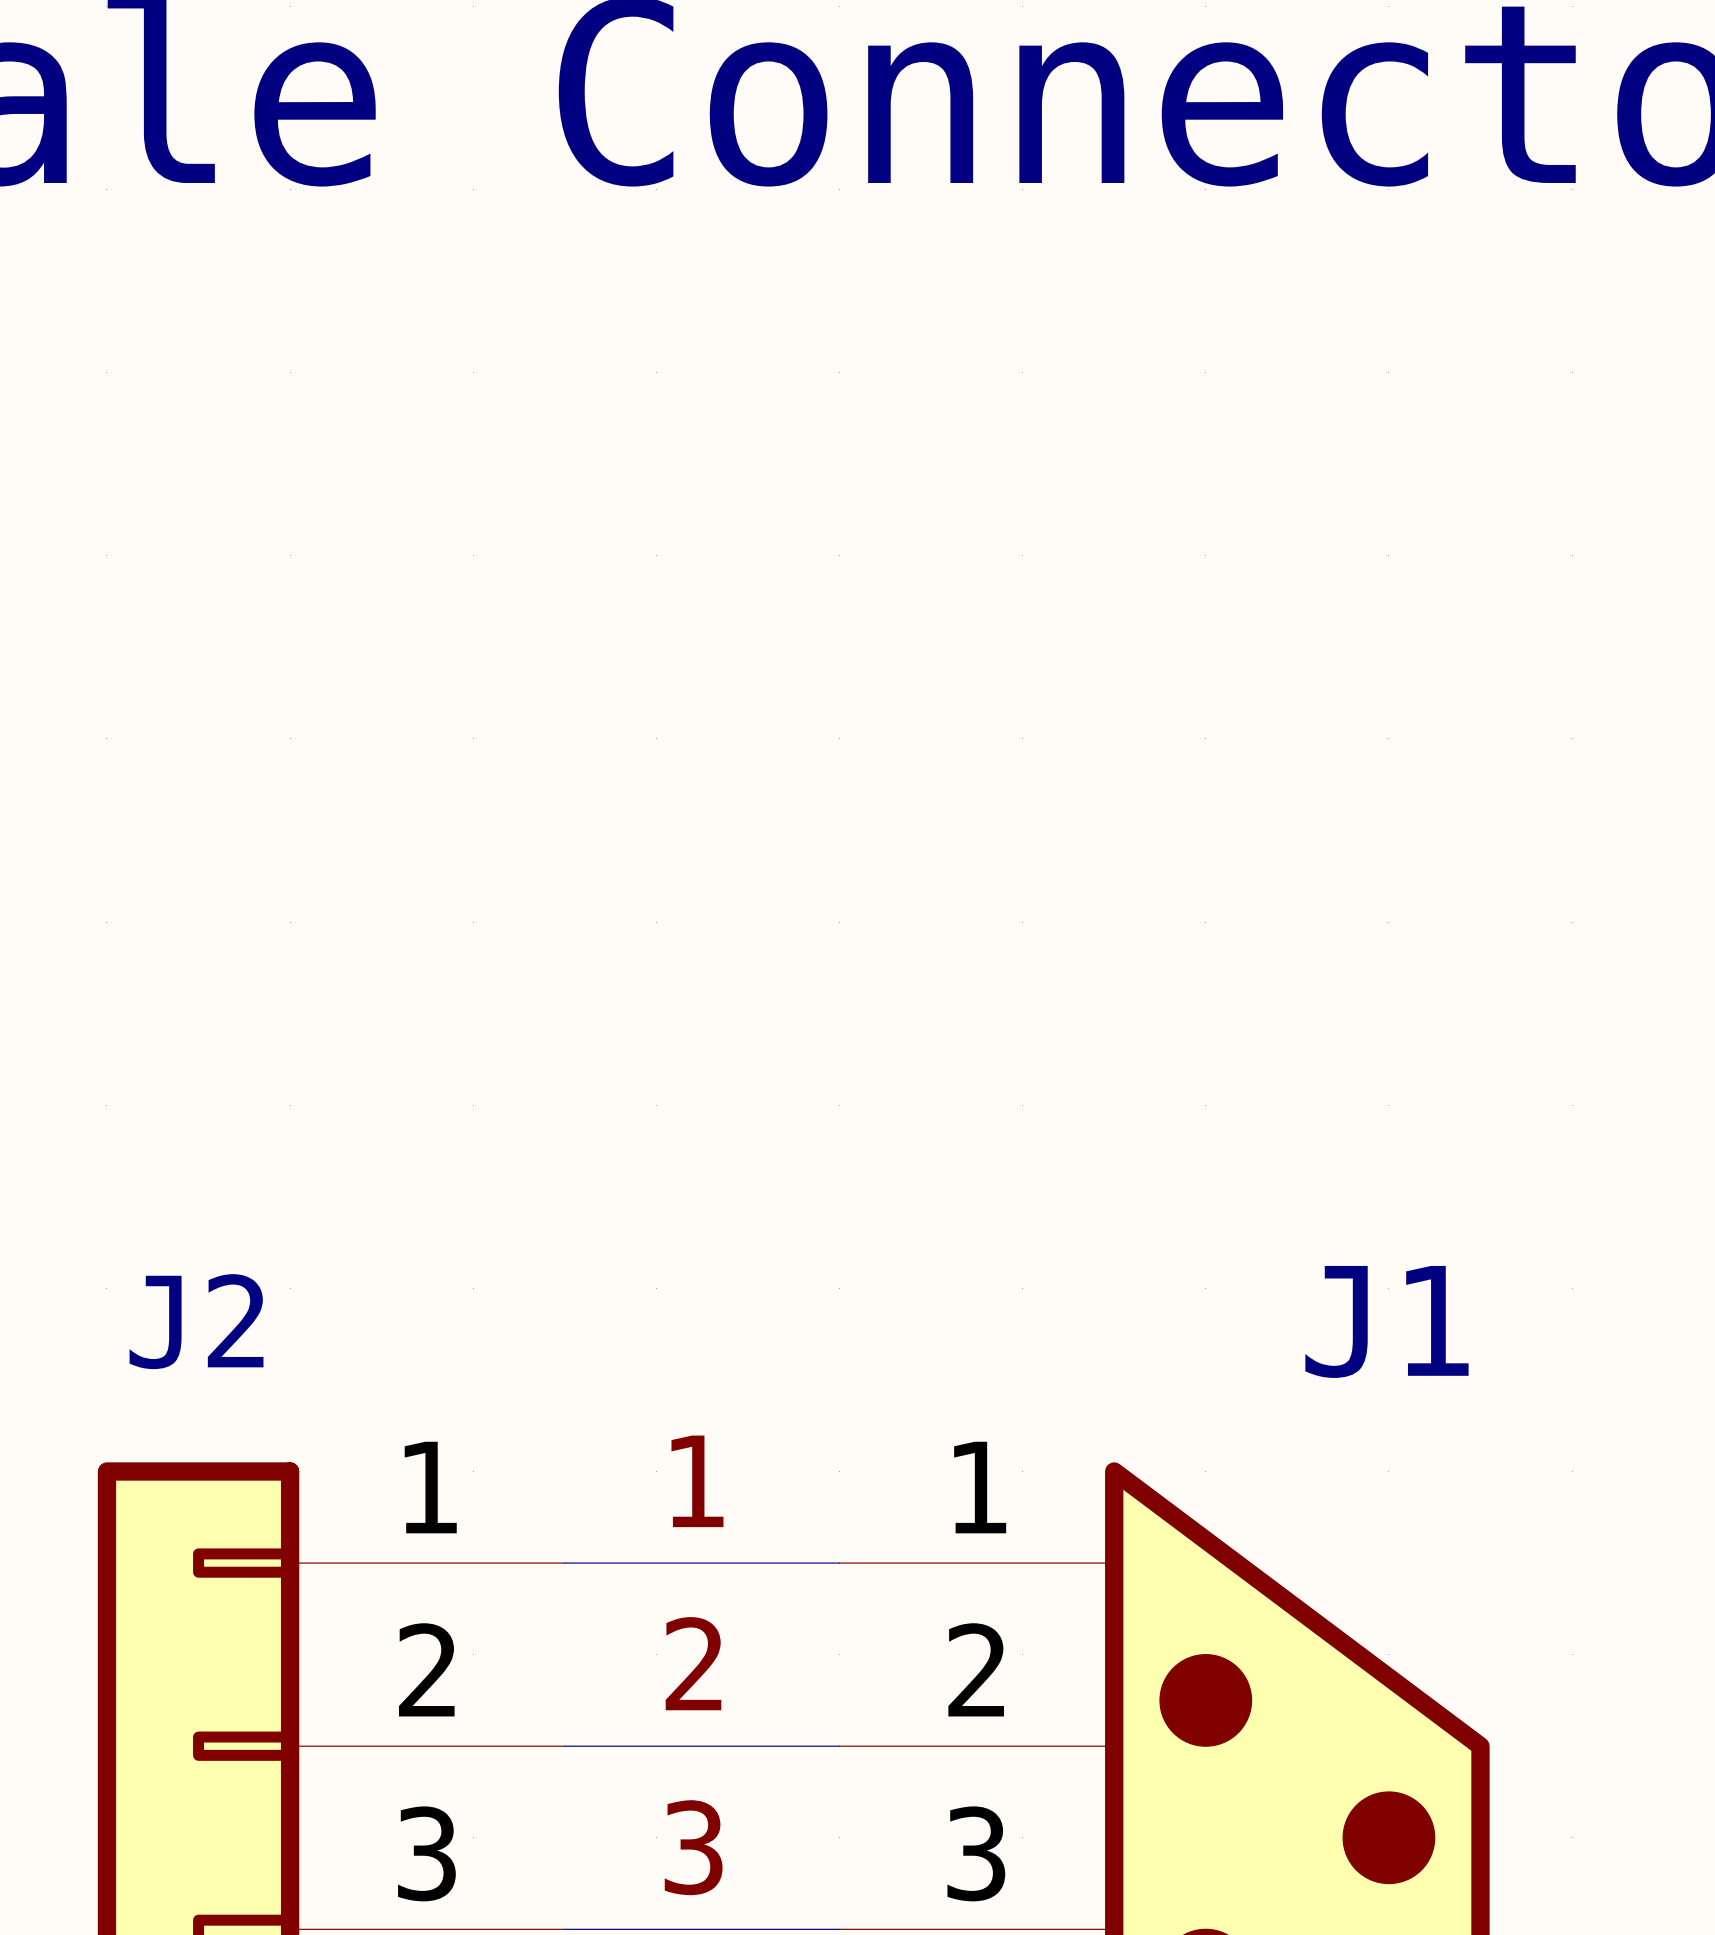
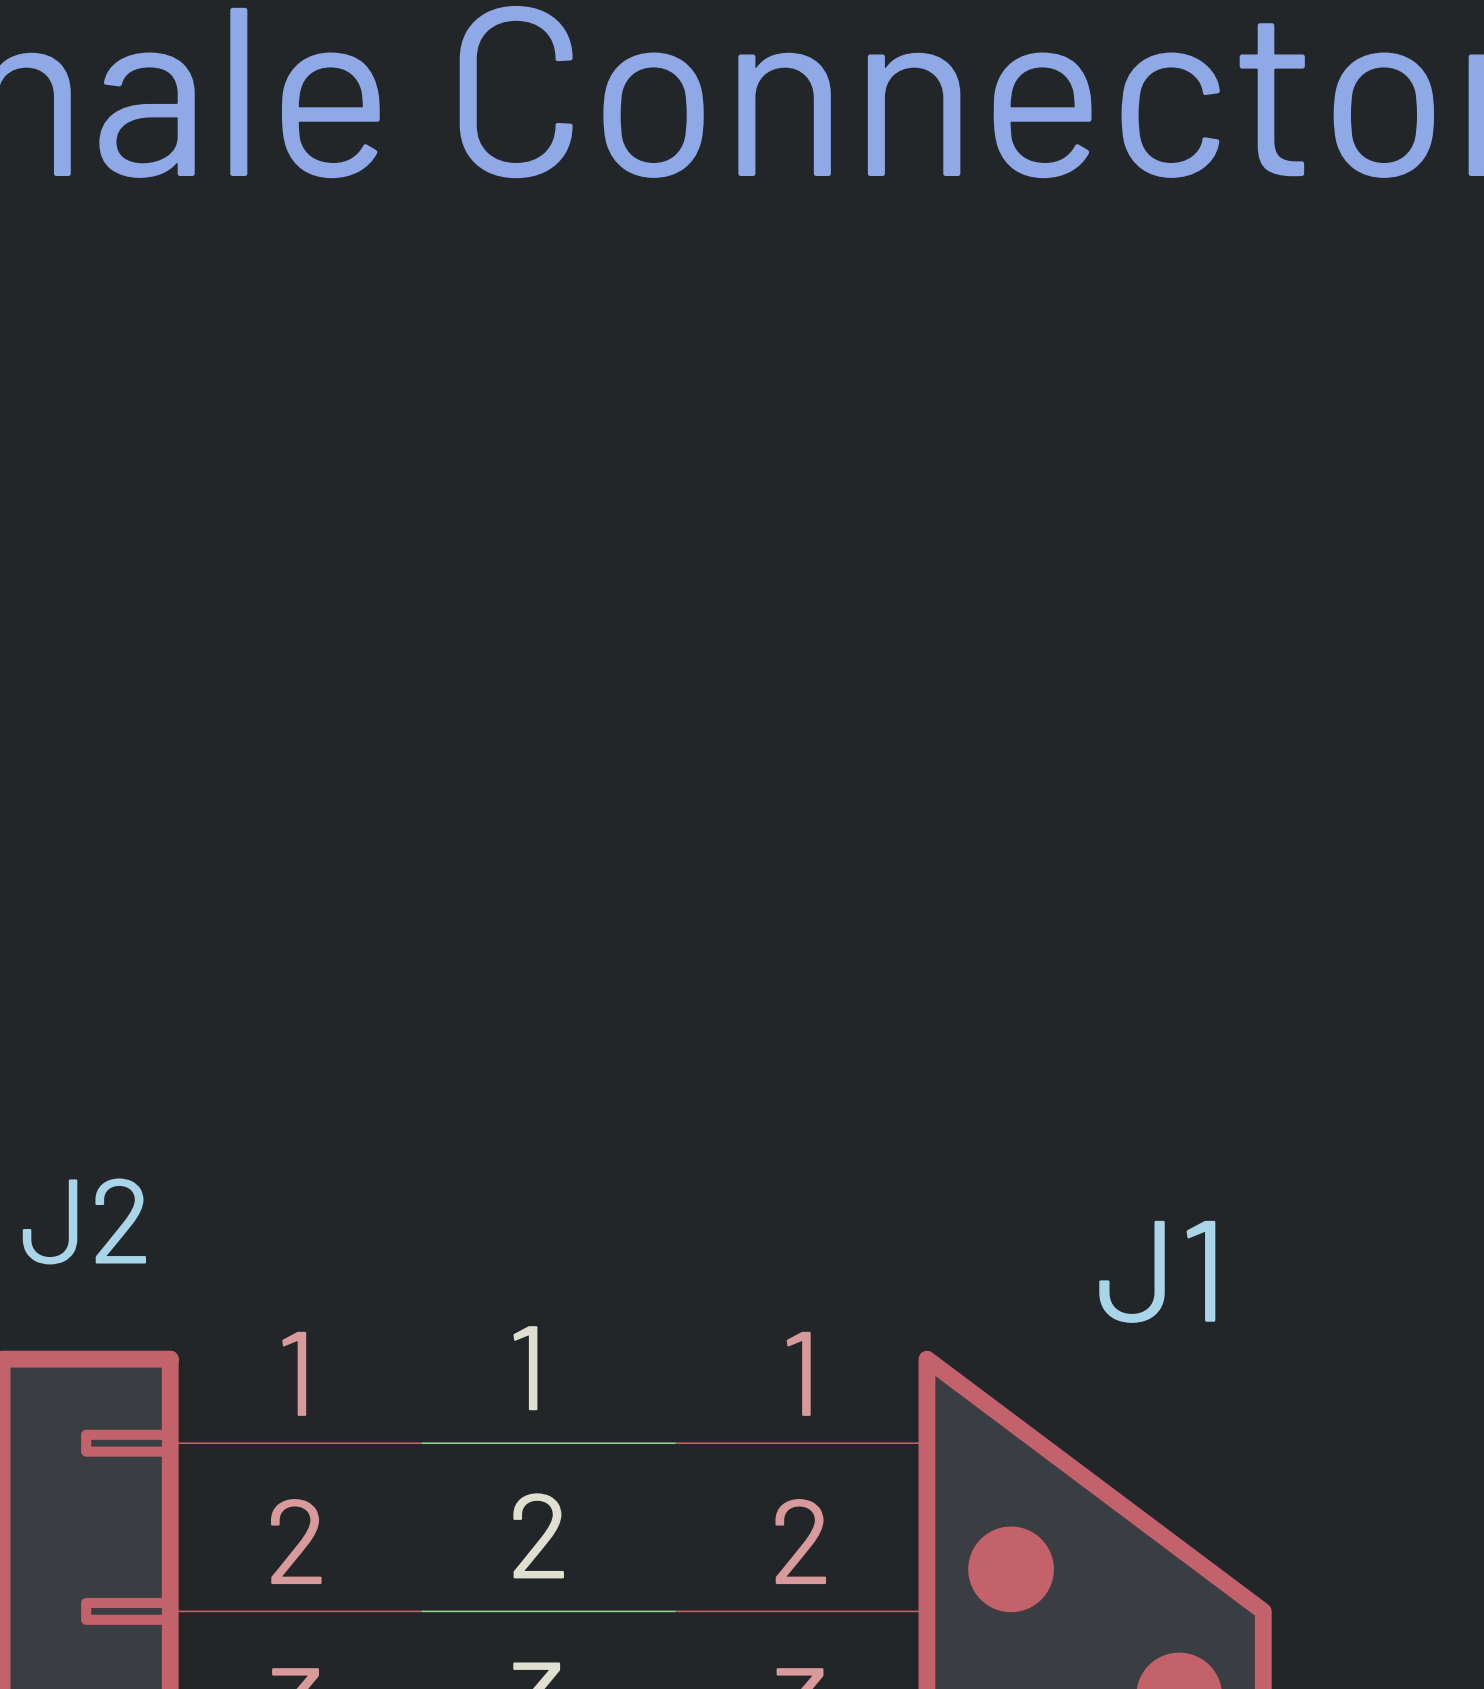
J1 name position: J1 (1386, 1321) -> J1 (1157, 1271)

